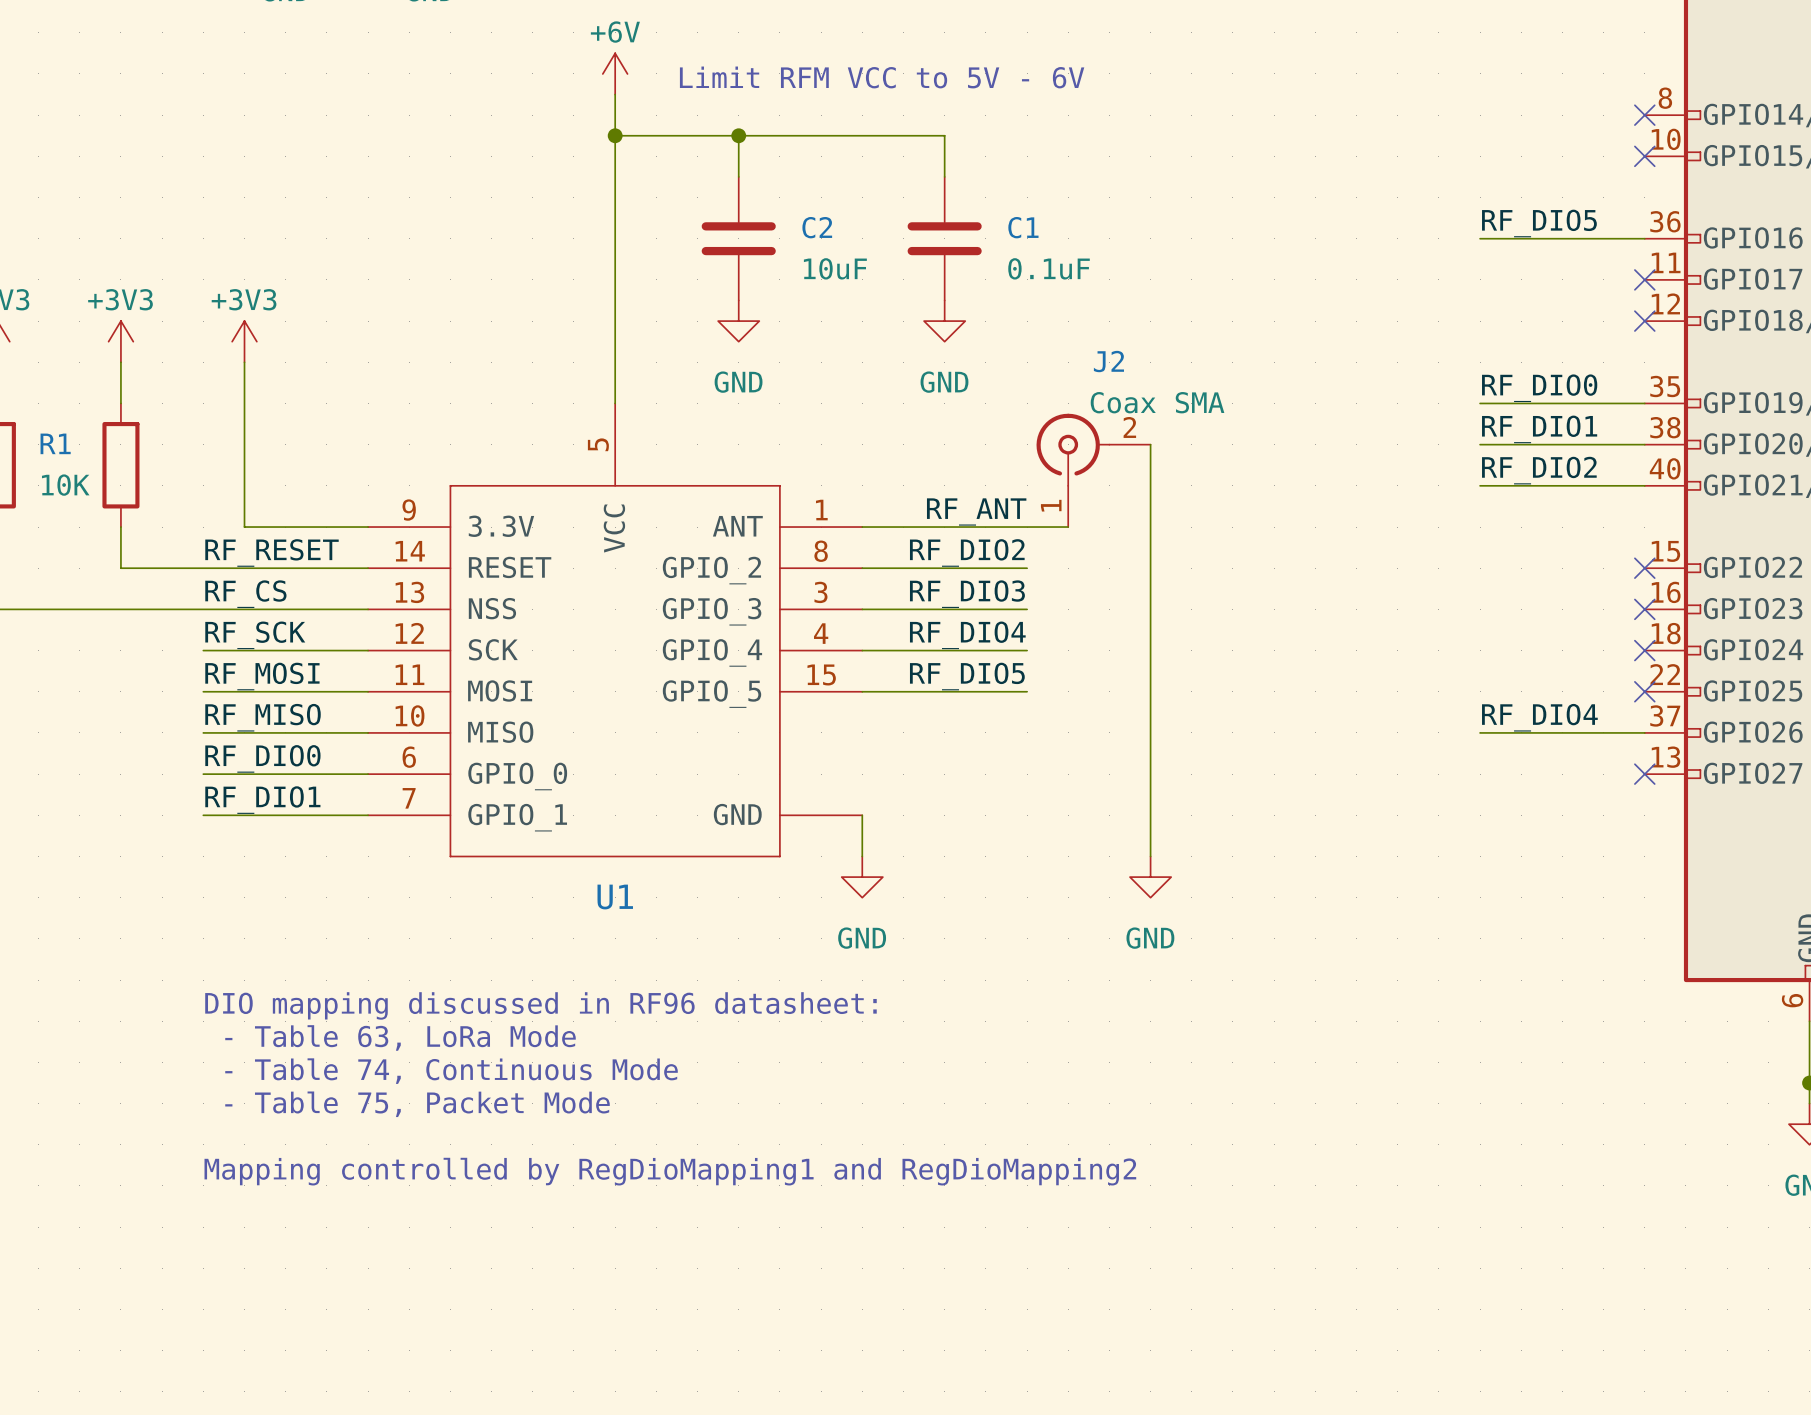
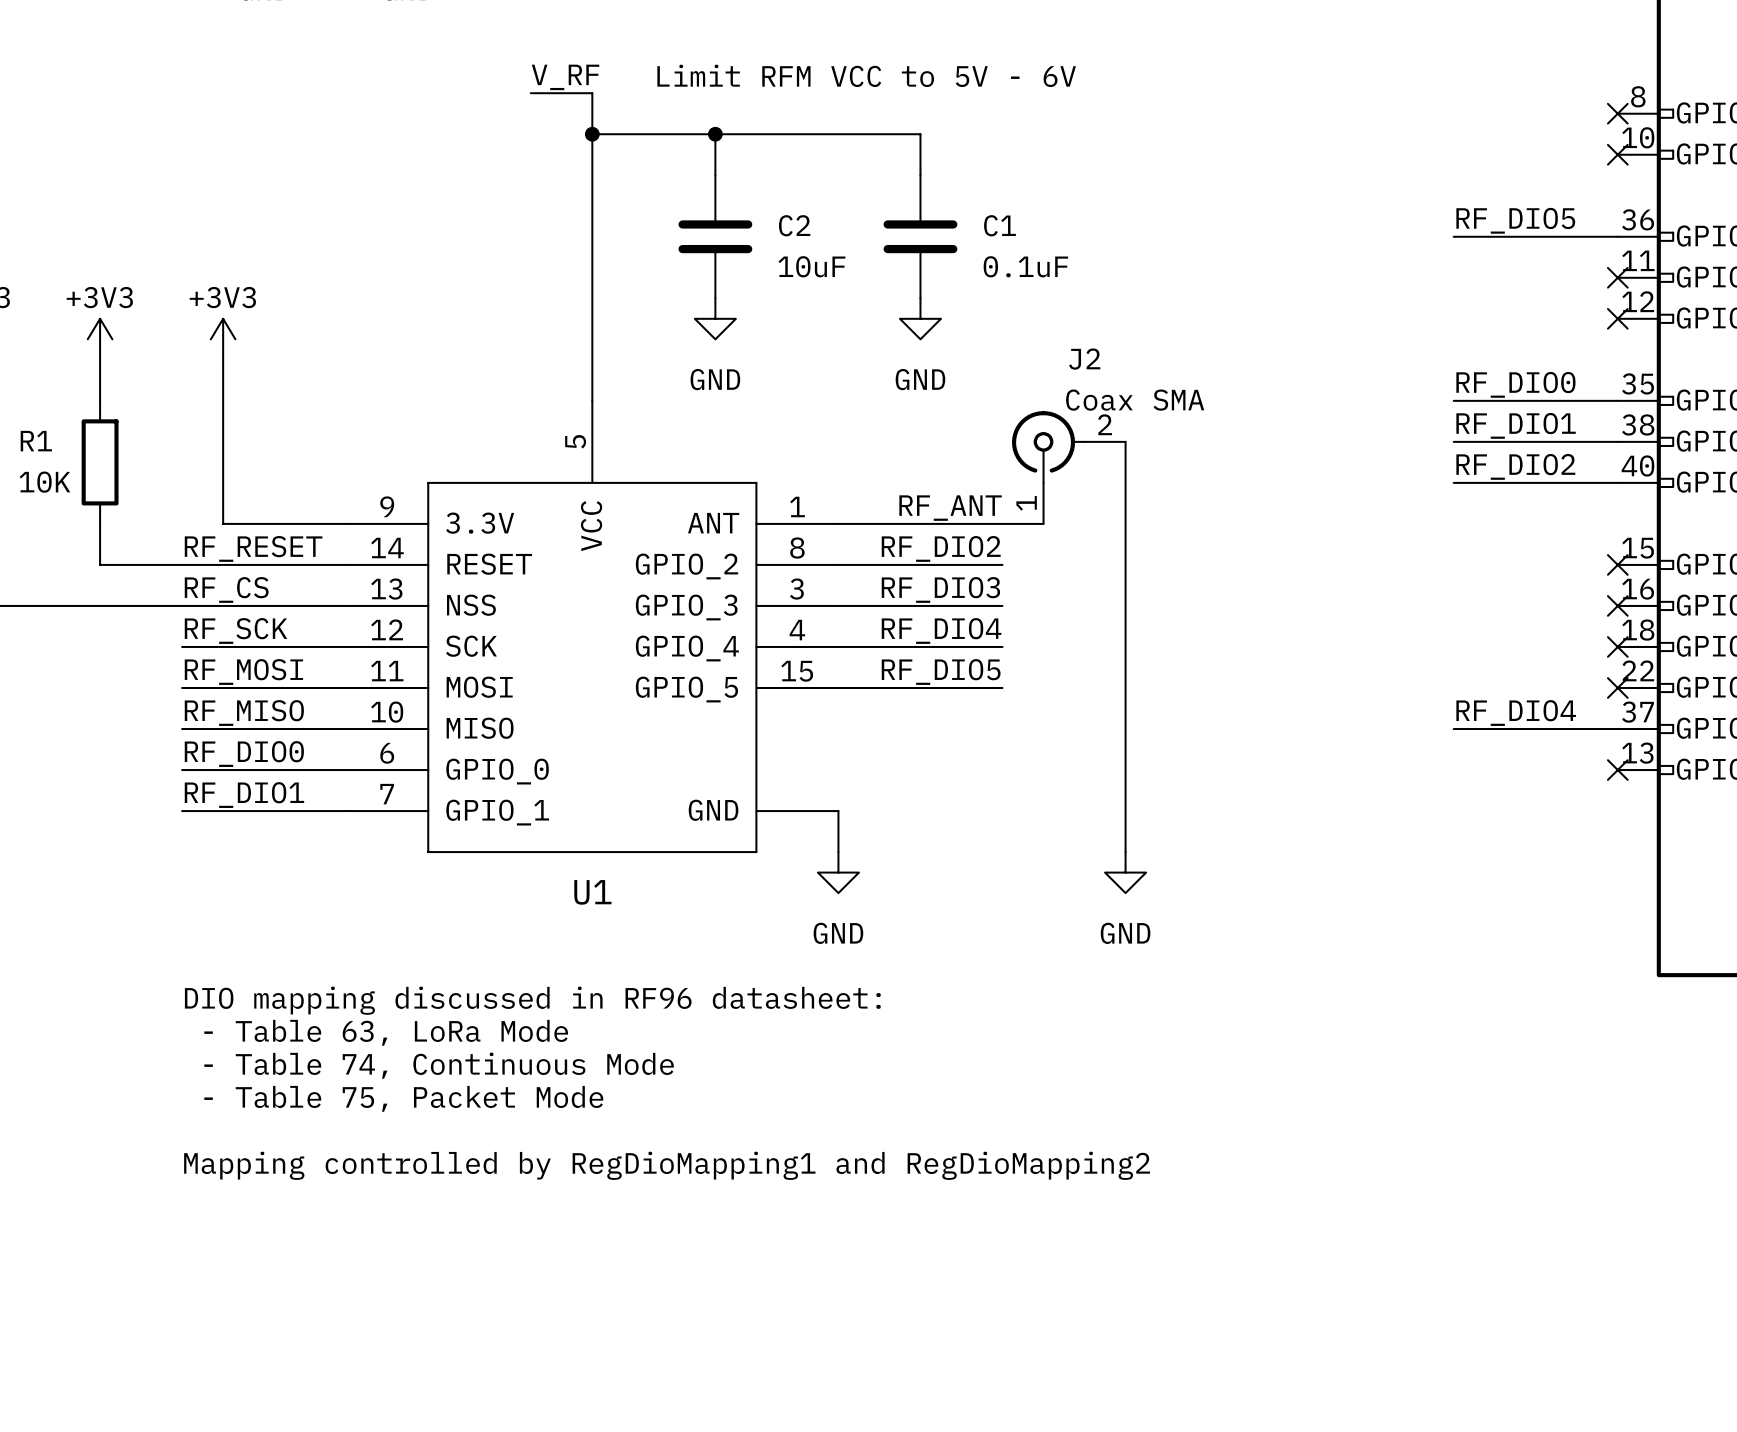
power symbol: +6V (615, 73) -> none
label: none -> V_RF (565, 77)
wire: none -> (530, 93) (592, 93)

